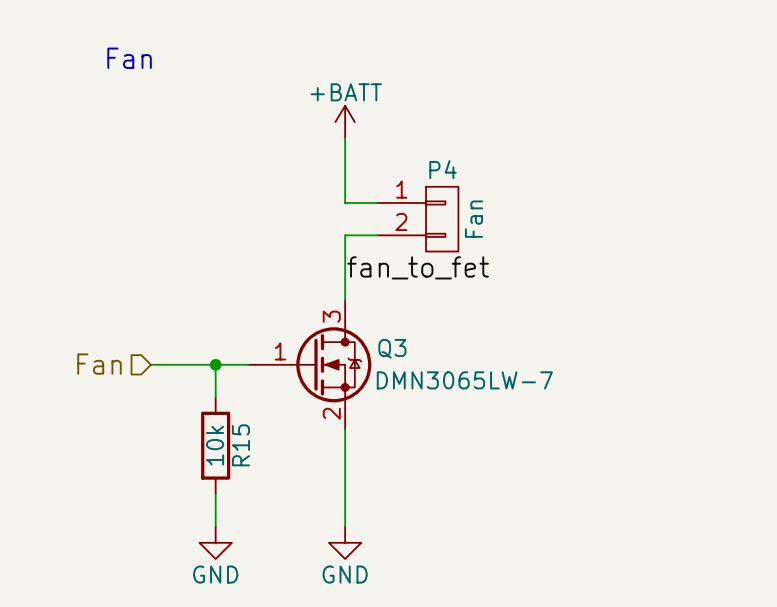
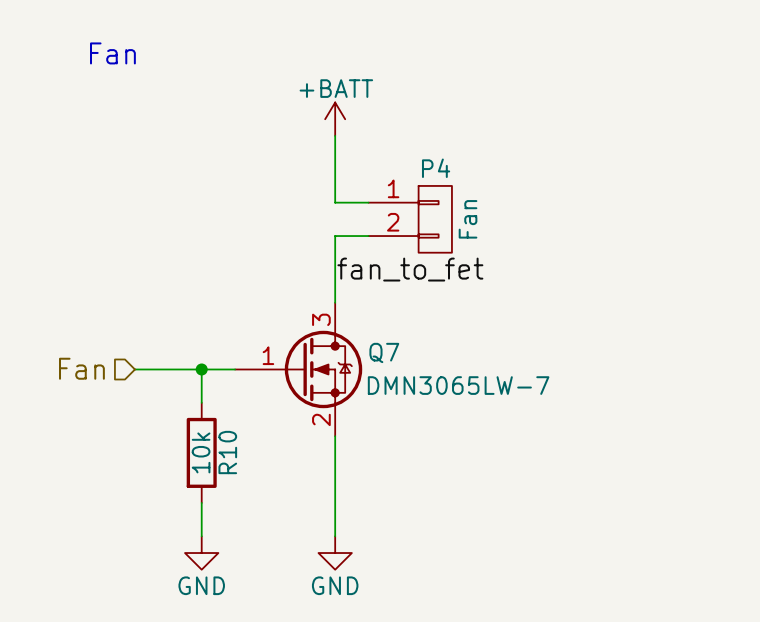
Q3 name: Q3 (392, 348) -> Q7 (384, 352)
R15 name: R15 (240, 445) -> R10 (227, 452)

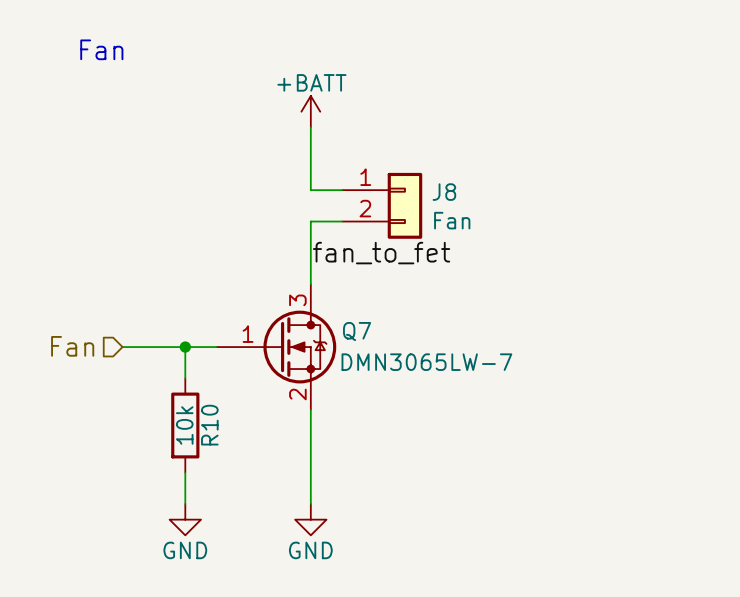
P4: Fan (410, 219) -> none
J8: none -> Fan (382, 205)

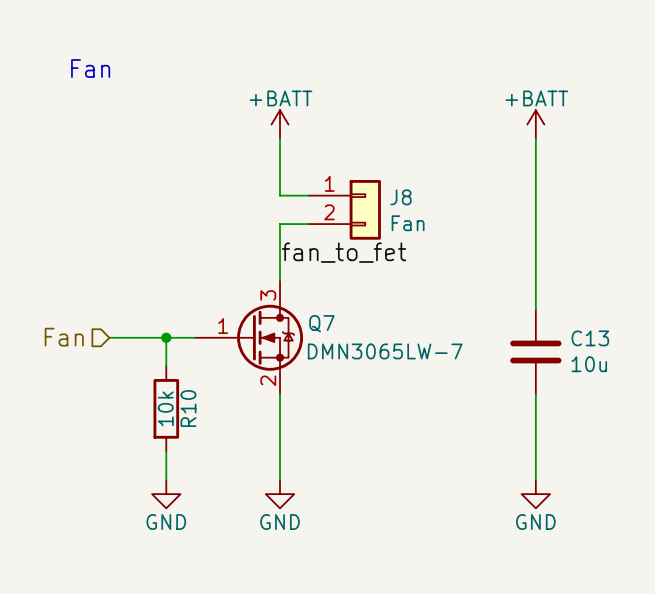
power symbol: none -> +BATT (535, 124)
wire: none -> (535, 138) (535, 309)
C13: none -> 10u (535, 351)
wire: none -> (535, 394) (535, 479)
power symbol: none -> GND (535, 494)

